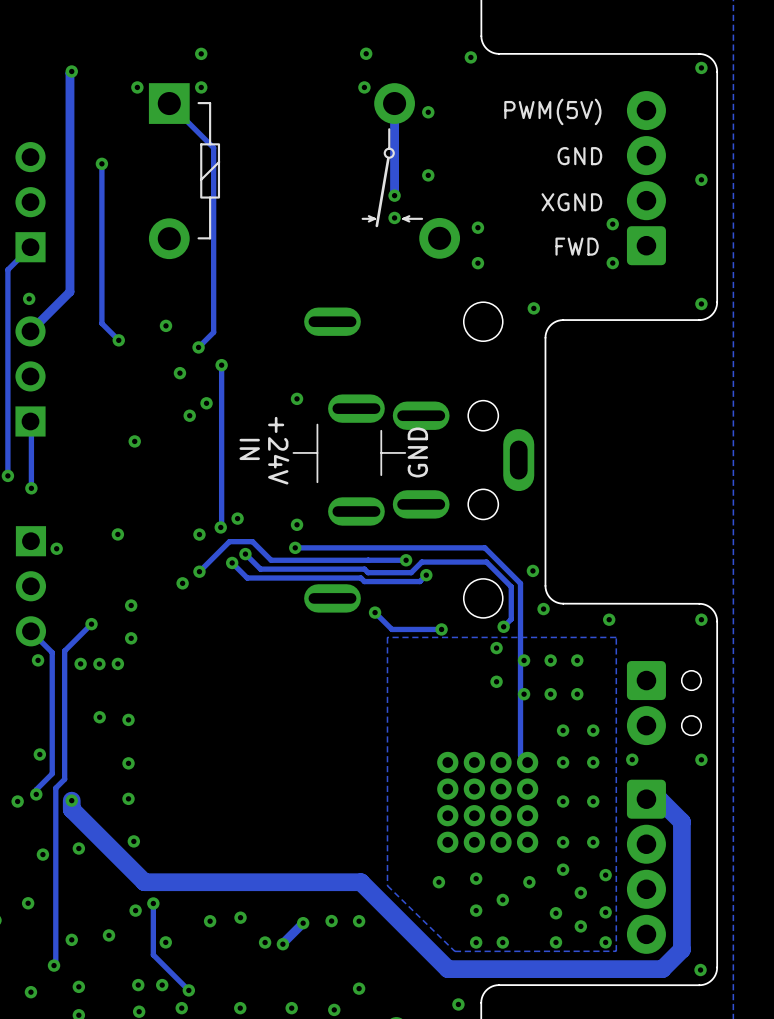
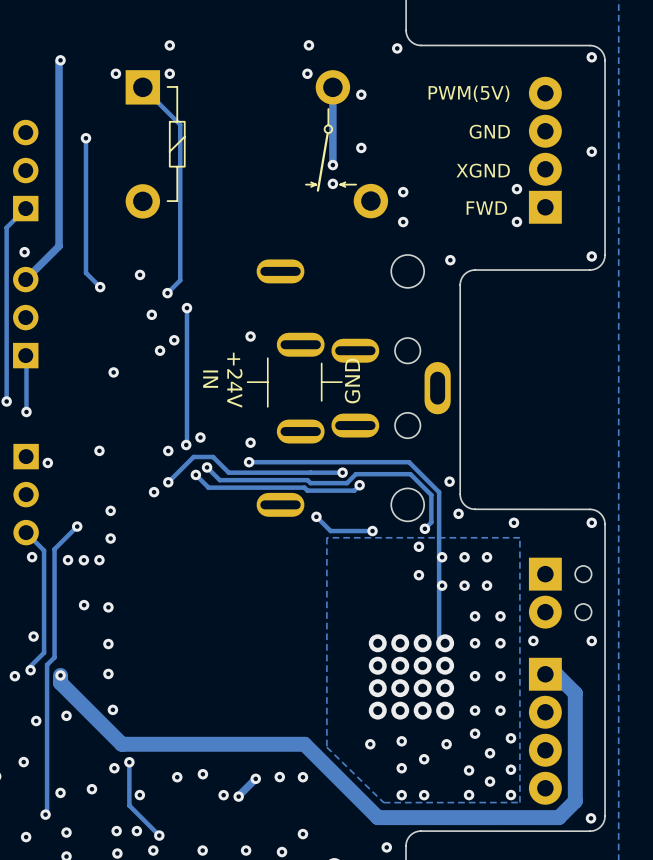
part footprint: [626, 91, 666, 266] -> [528, 76, 562, 224]
part footprint: [626, 661, 702, 746] -> [528, 557, 592, 629]
part footprint: [626, 779, 666, 954] -> [528, 657, 562, 805]

